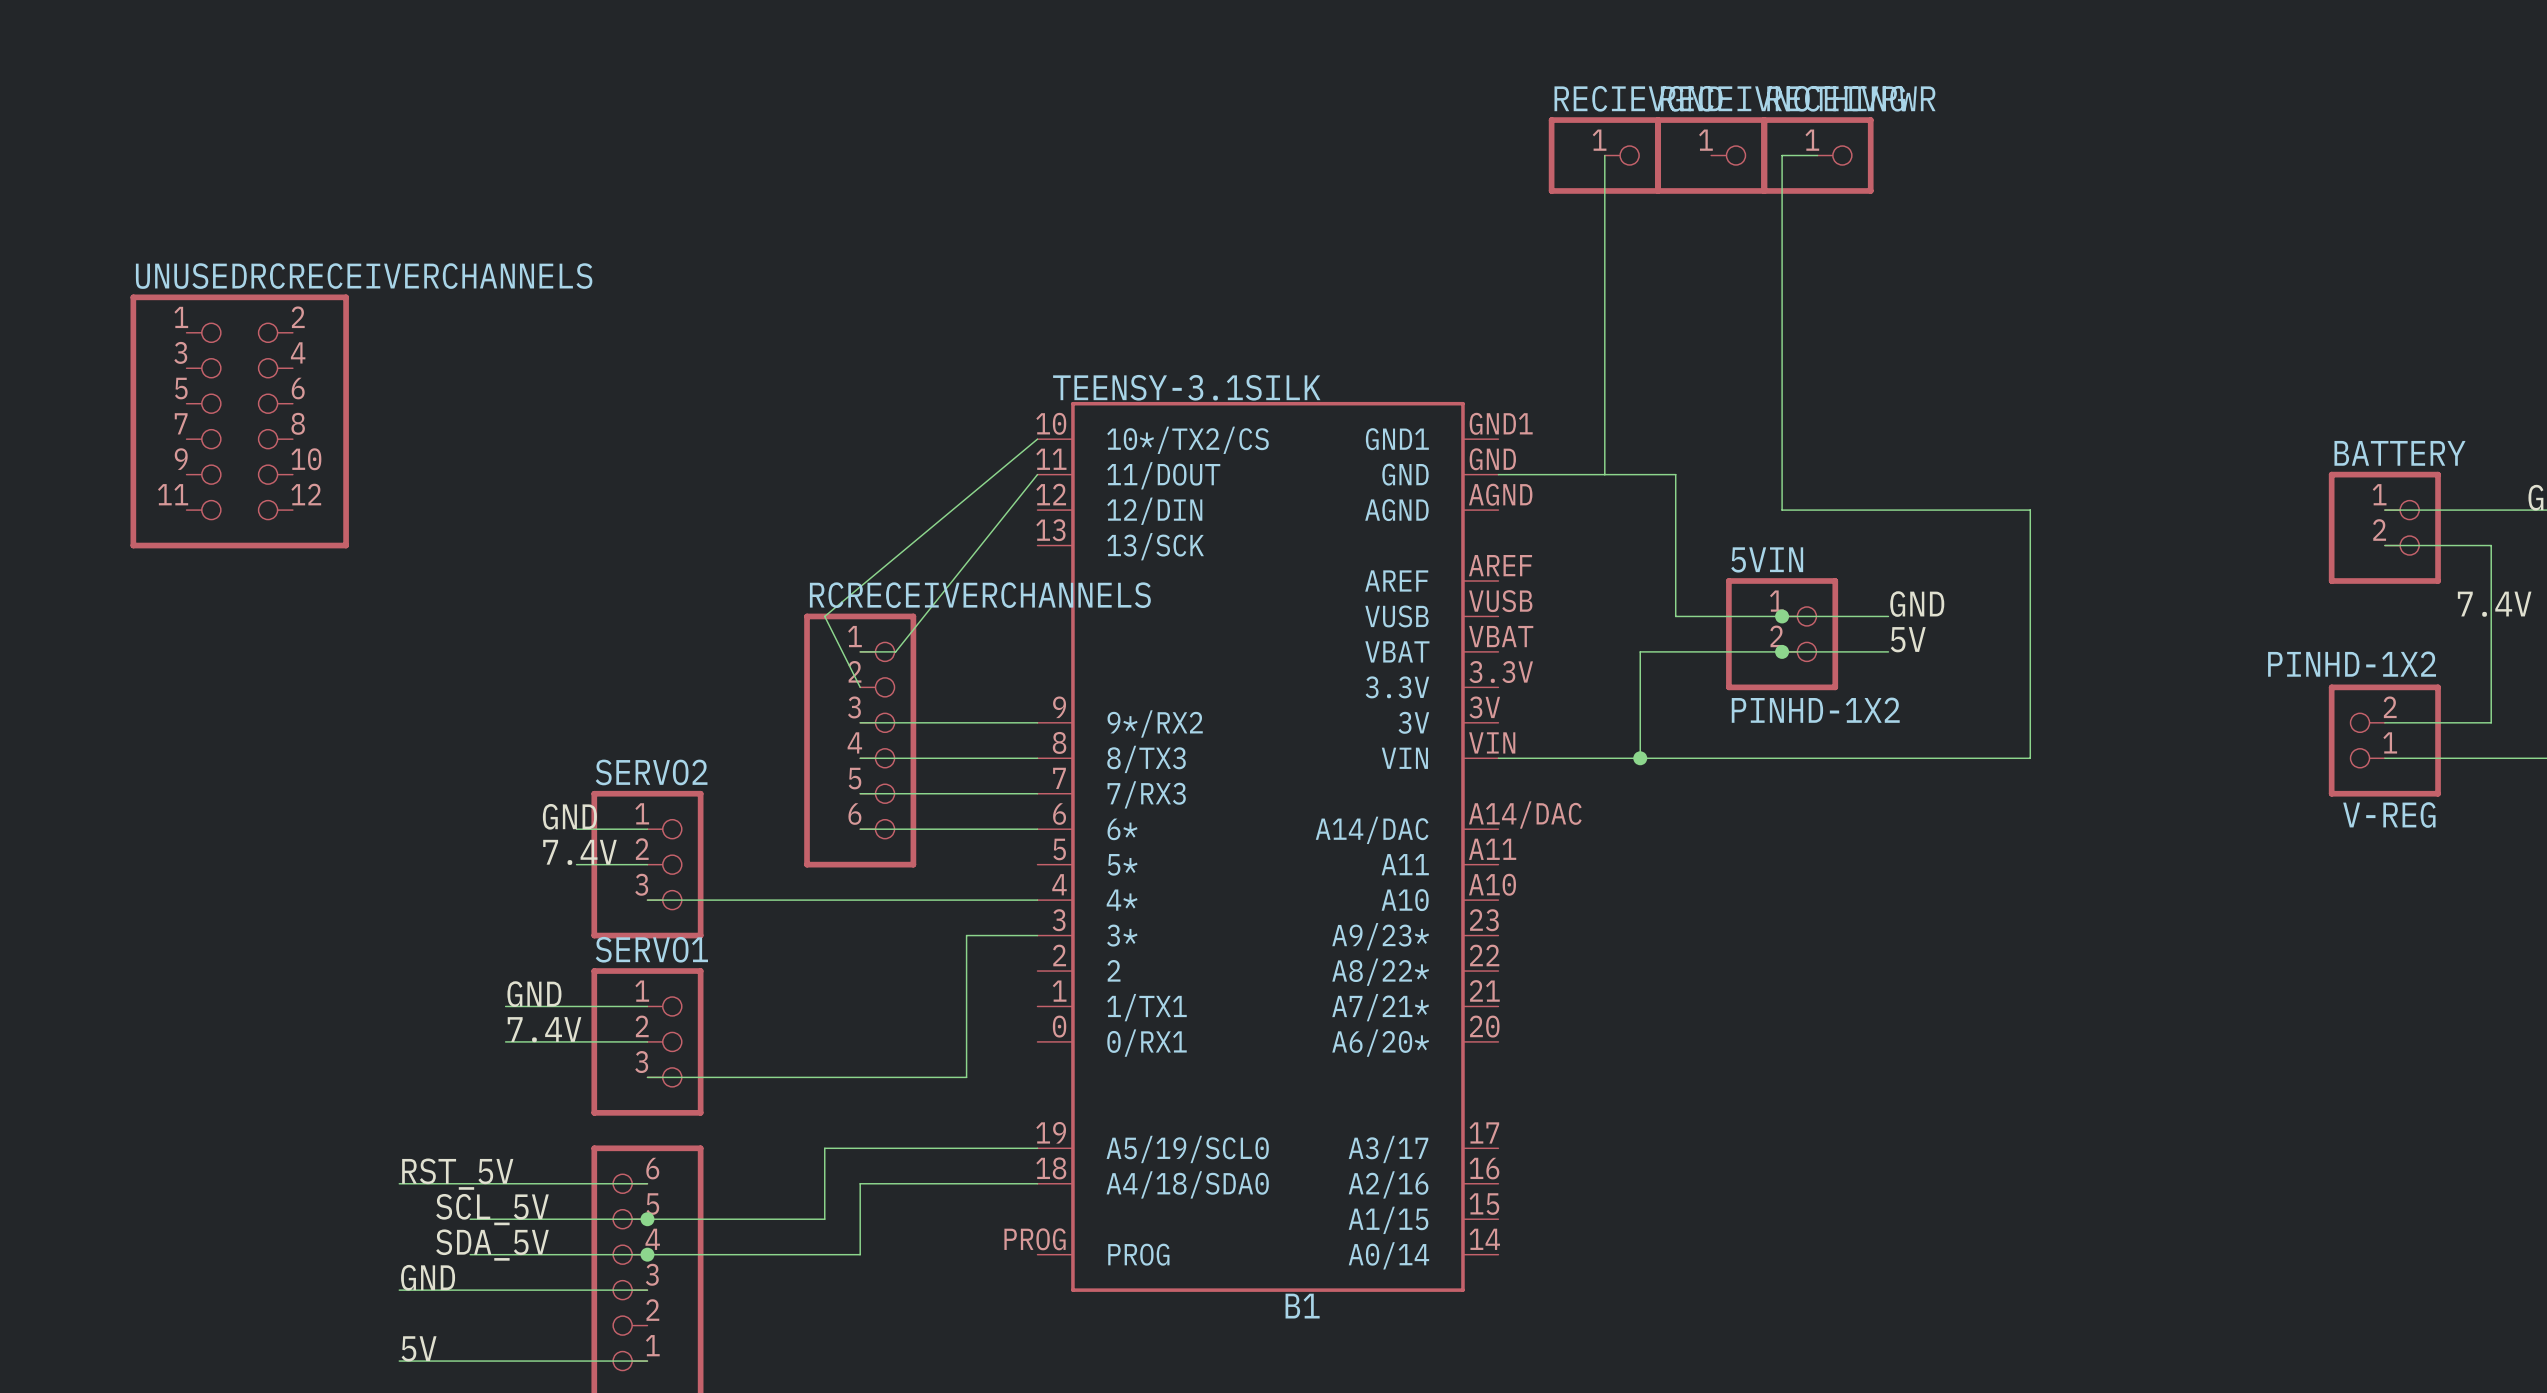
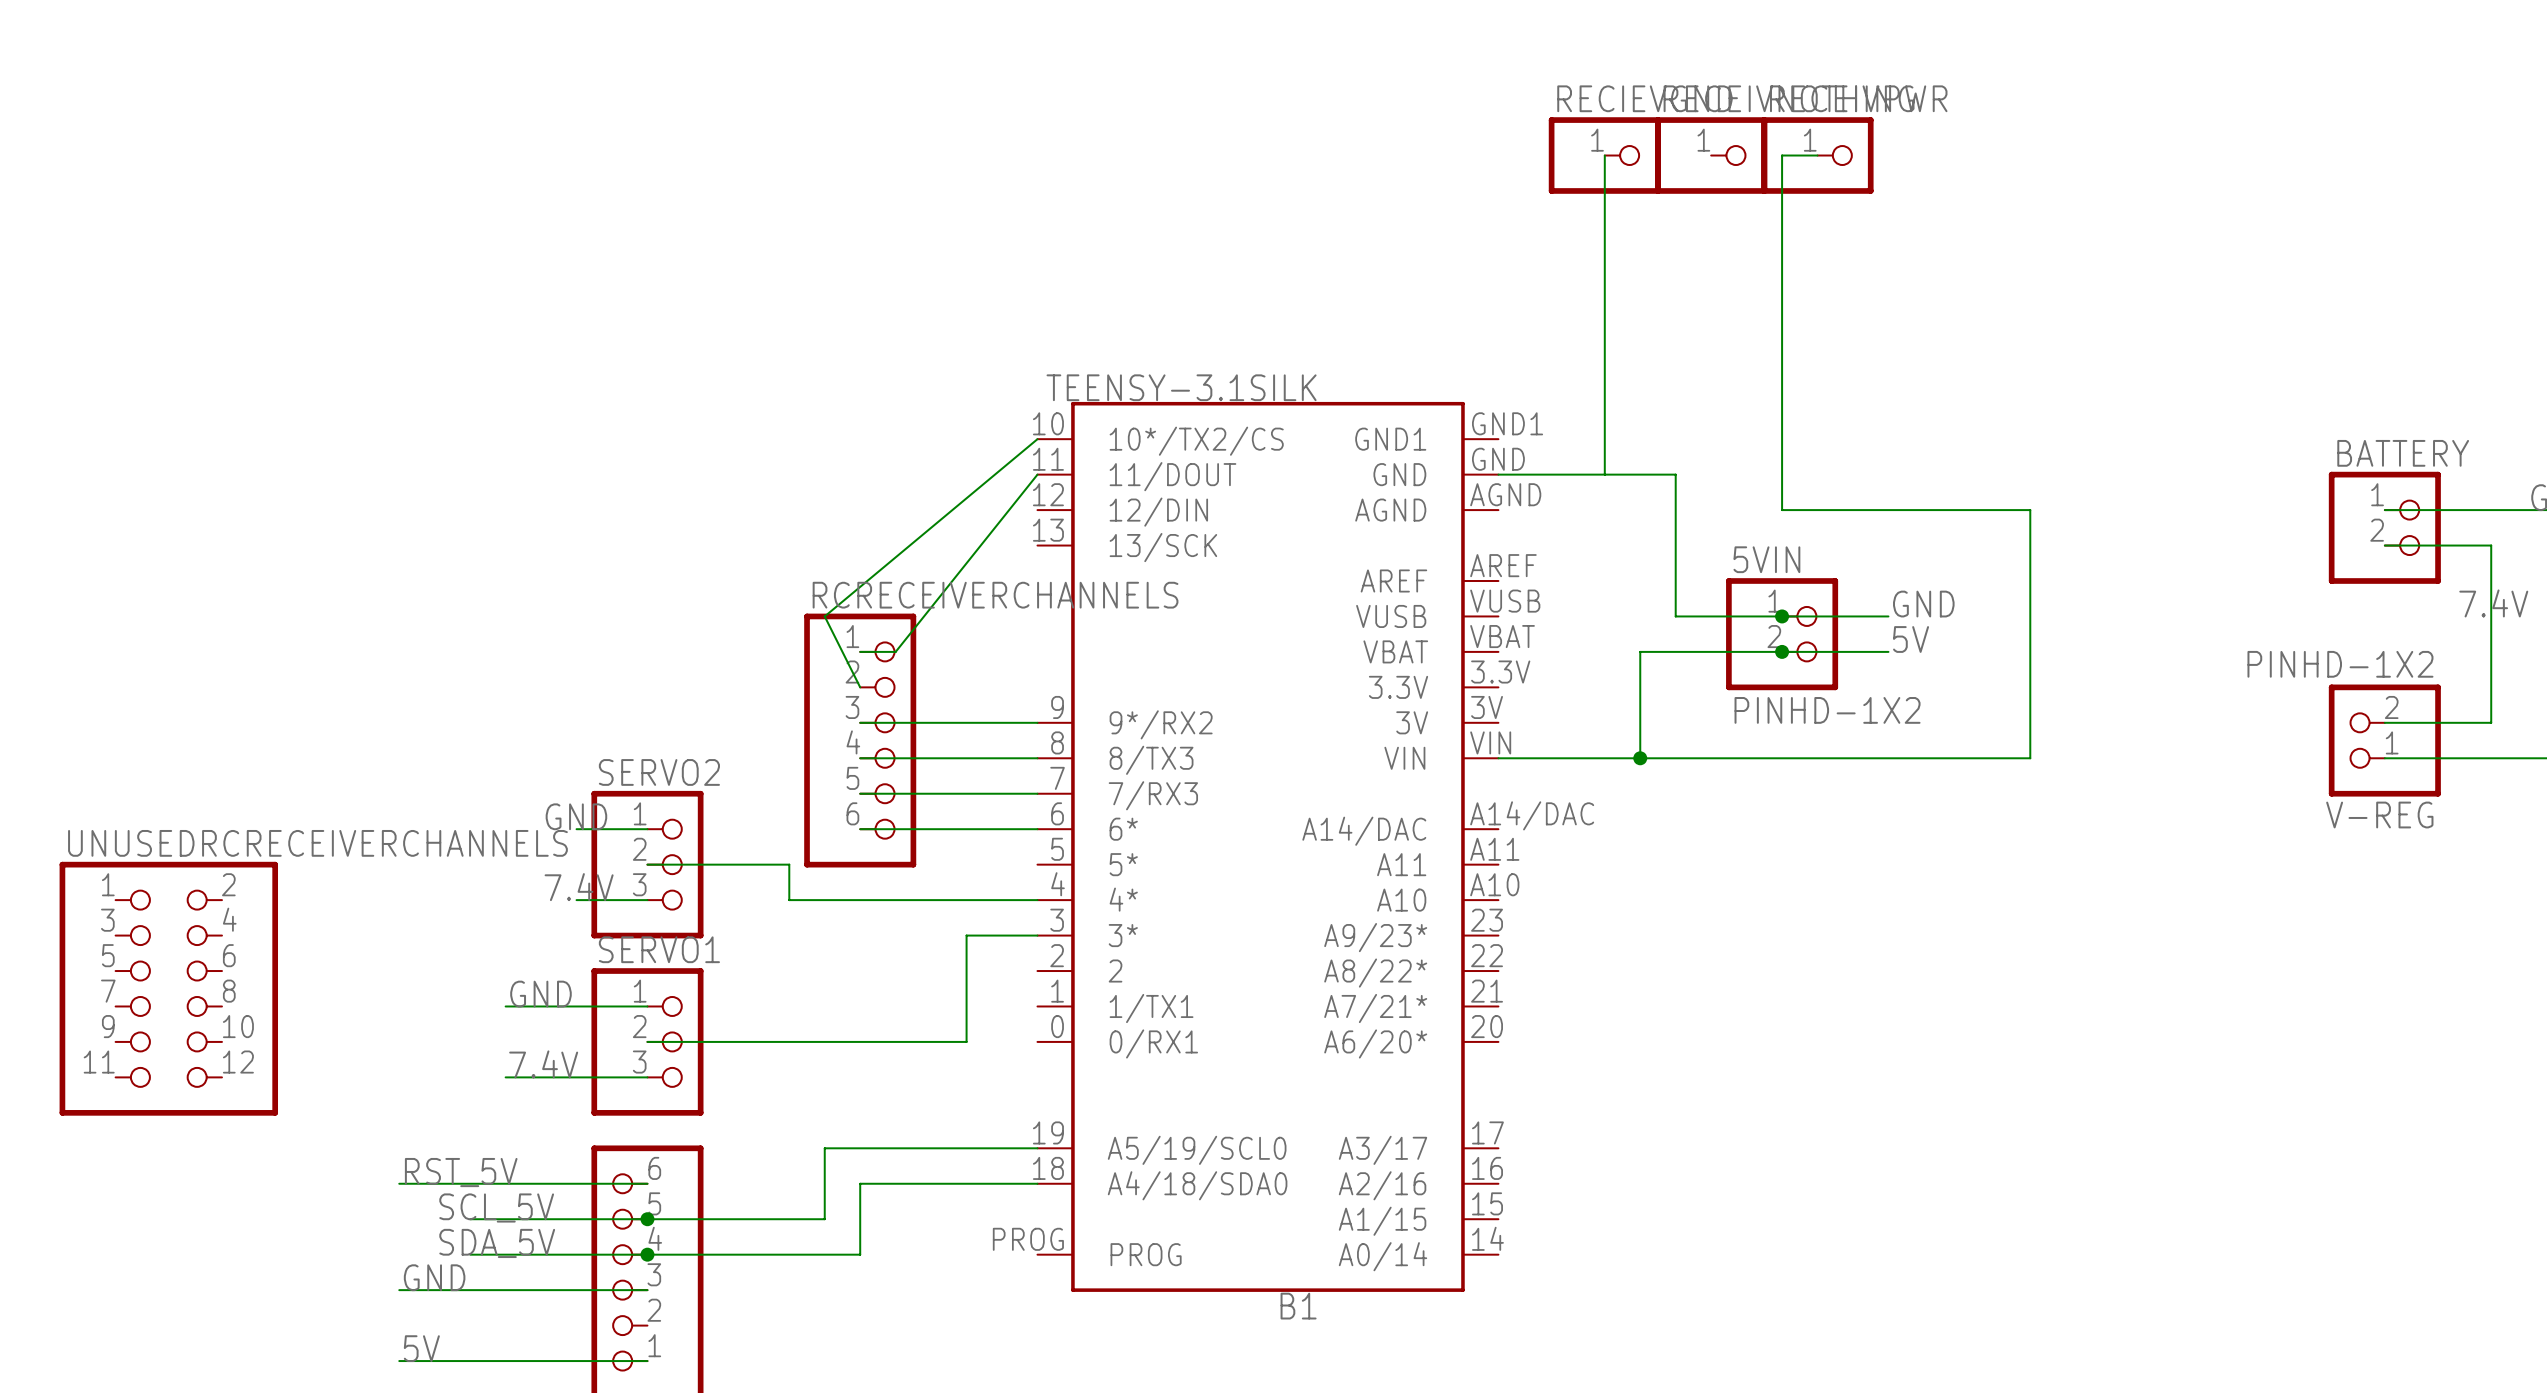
UNUSEDRCRECEIVERCHANNELS: (239, 421) -> none
label position: 7.4V (579, 852) -> 7.4V (579, 887)
wire: (576, 864) (647, 864) -> (576, 900) (647, 900)
wire: (647, 900) (789, 900) -> (647, 864) (789, 864) (789, 900)
UNUSEDRCRECEIVERCHANNELS: none -> (168, 988)
label position: 7.4V (544, 1029) -> 7.4V (543, 1064)
wire: (505, 1041) (647, 1041) -> (505, 1077) (647, 1077)
wire: (966, 1041) (966, 1077) (647, 1077) -> (966, 1041) (647, 1041)

